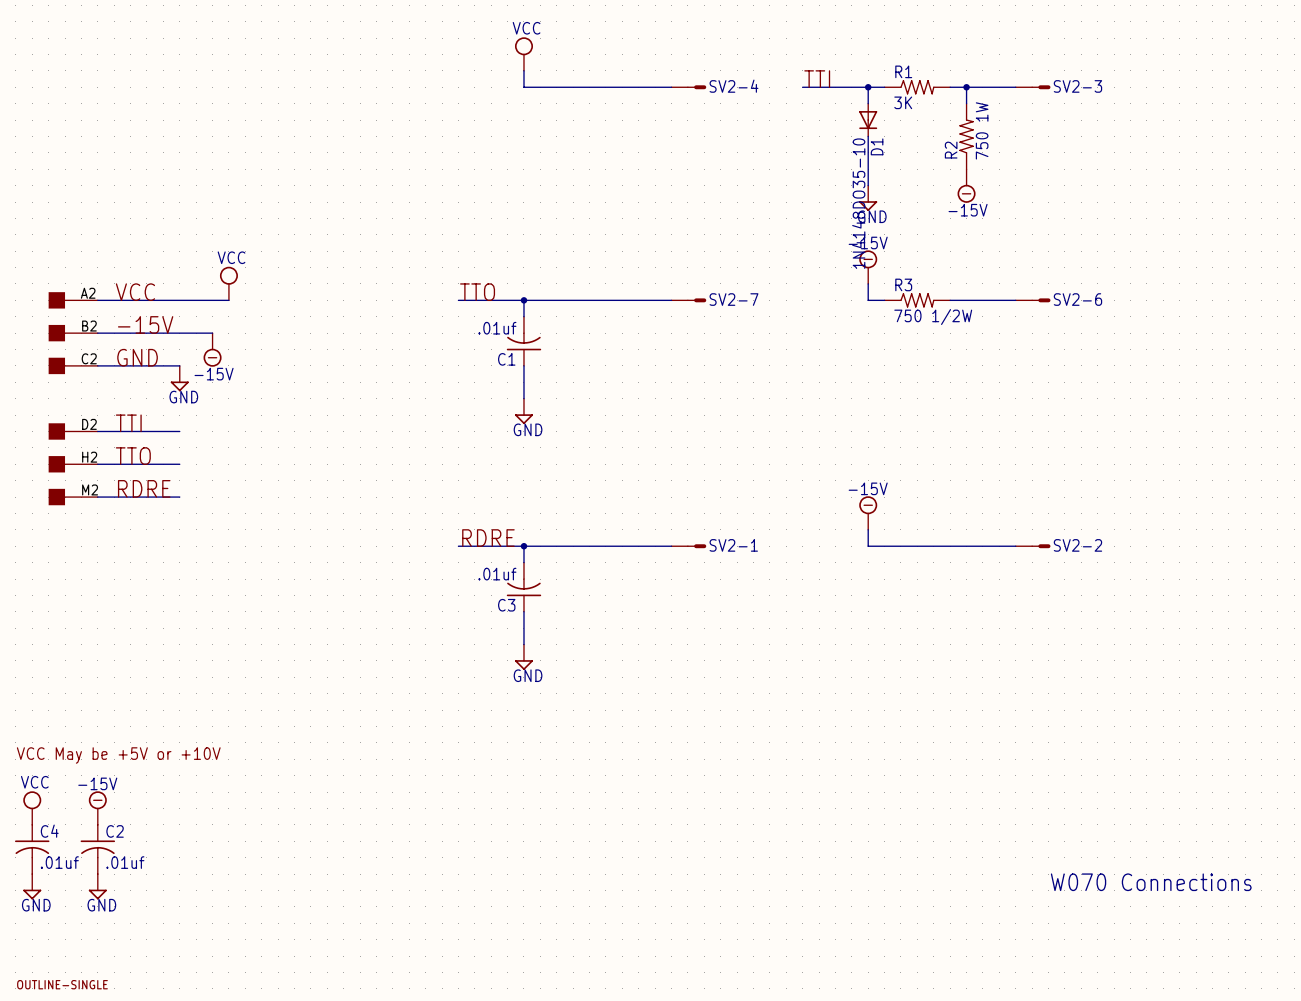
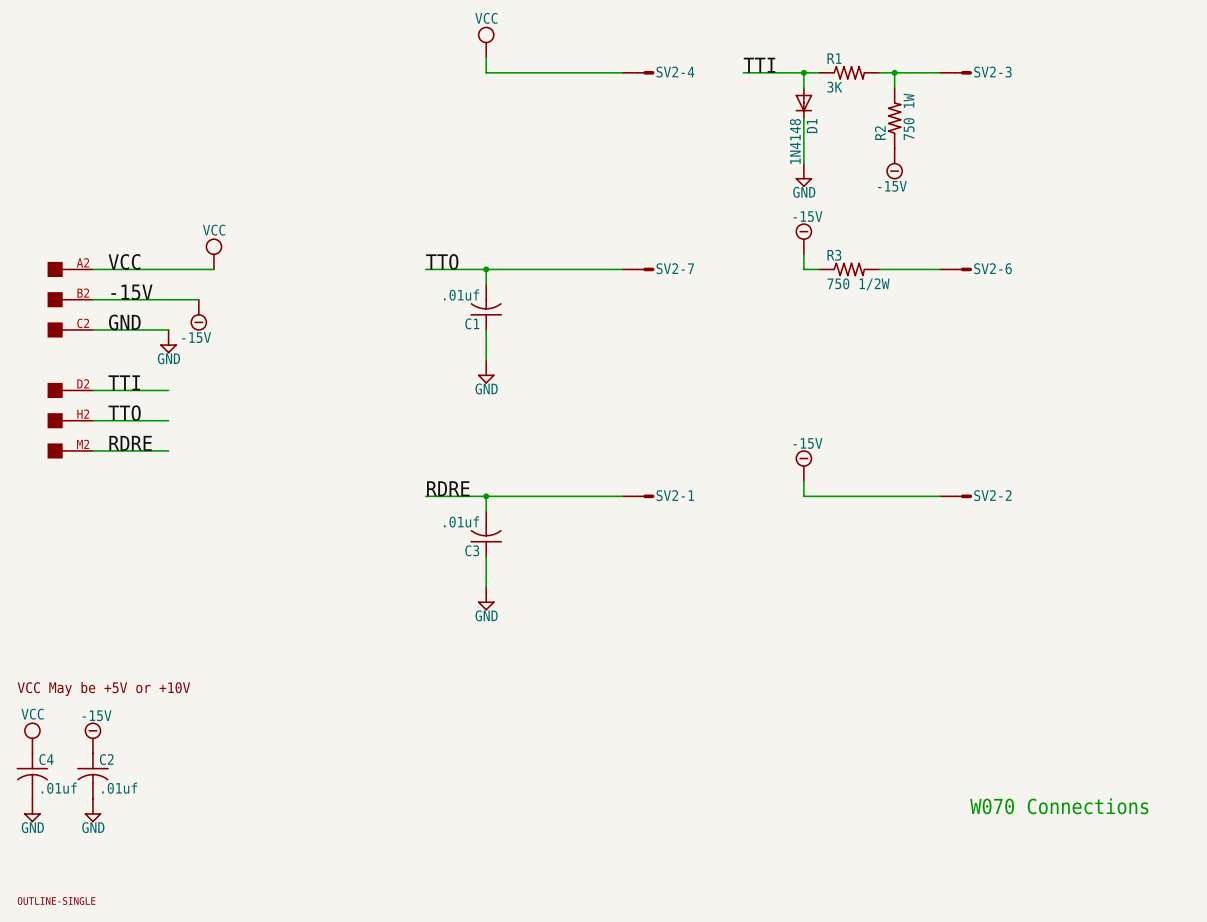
D1 value: 1N4148DO35-10 (858, 203) -> 1N4148 (795, 141)

